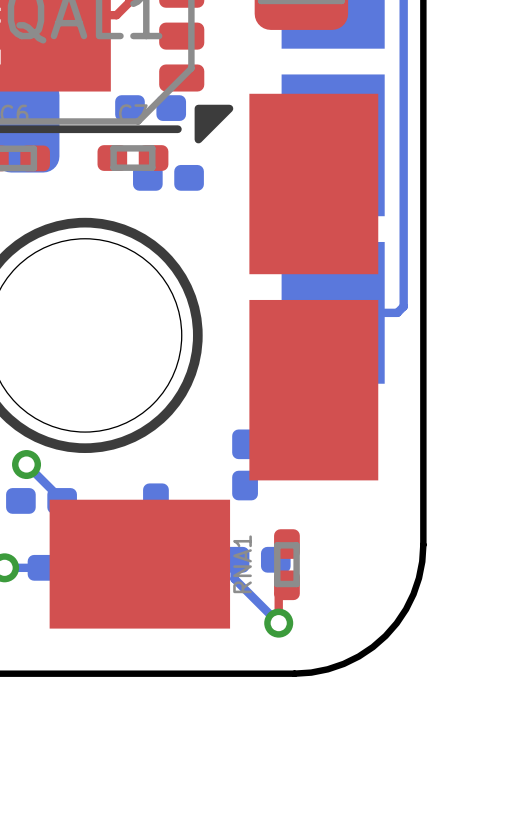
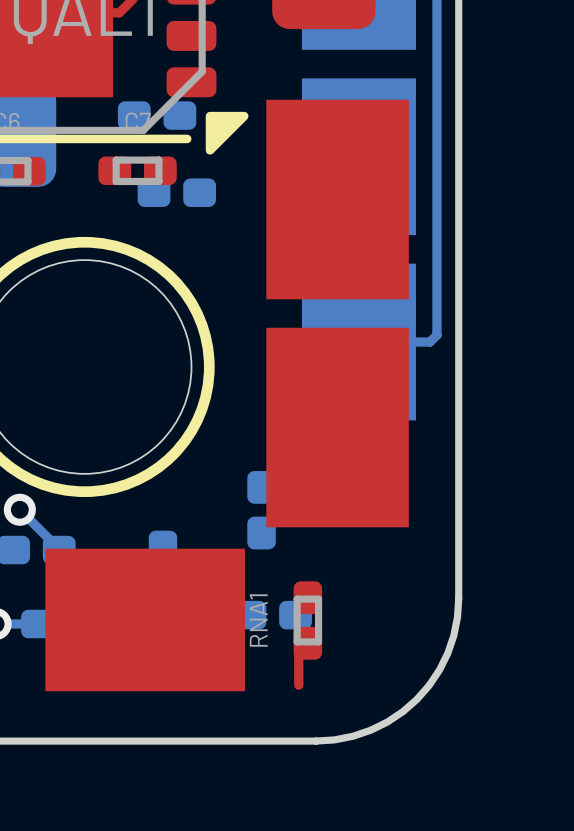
bottom track: (234, 559) (234, 578) (278, 623) -> none
via: (278, 623) -> none

